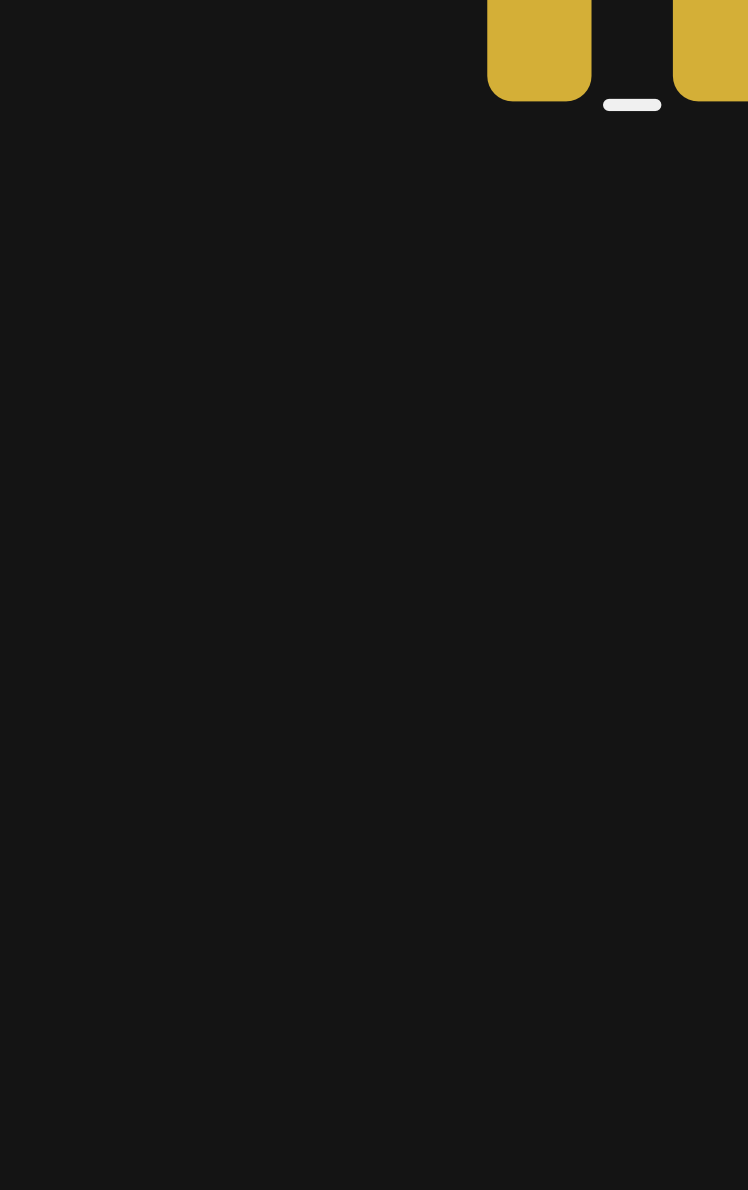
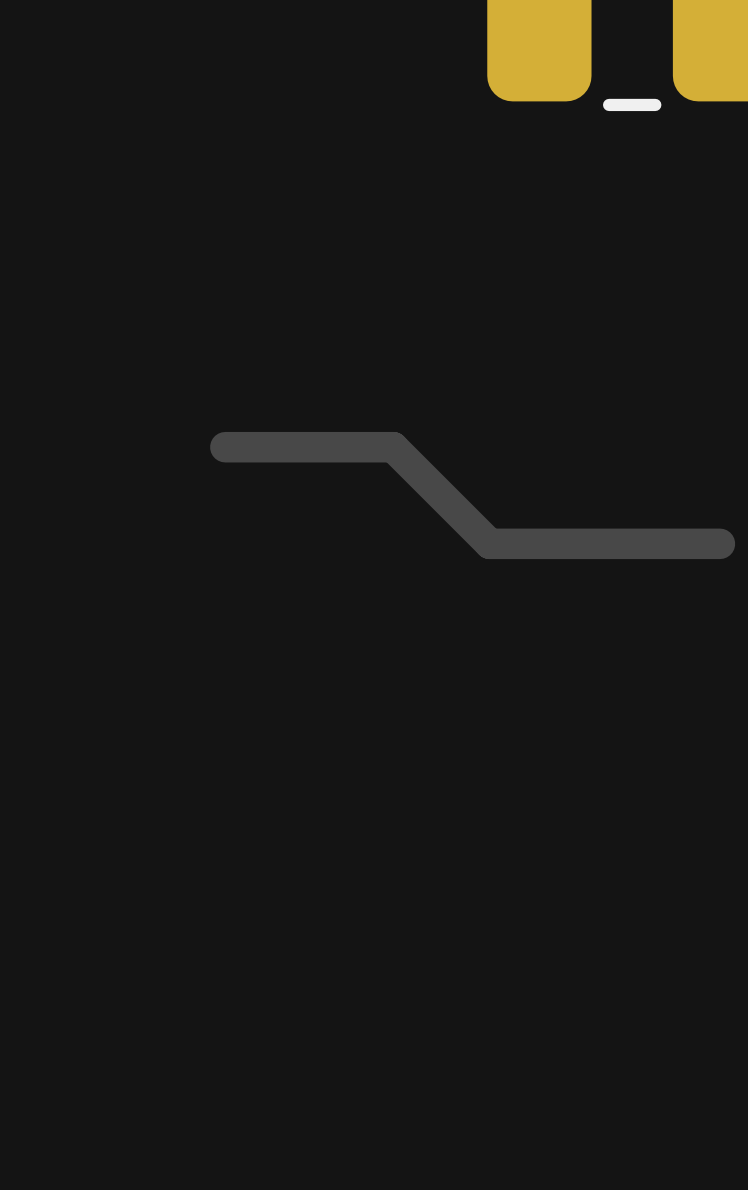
track: none -> (225, 447) (393, 447) (489, 543) (719, 543)

